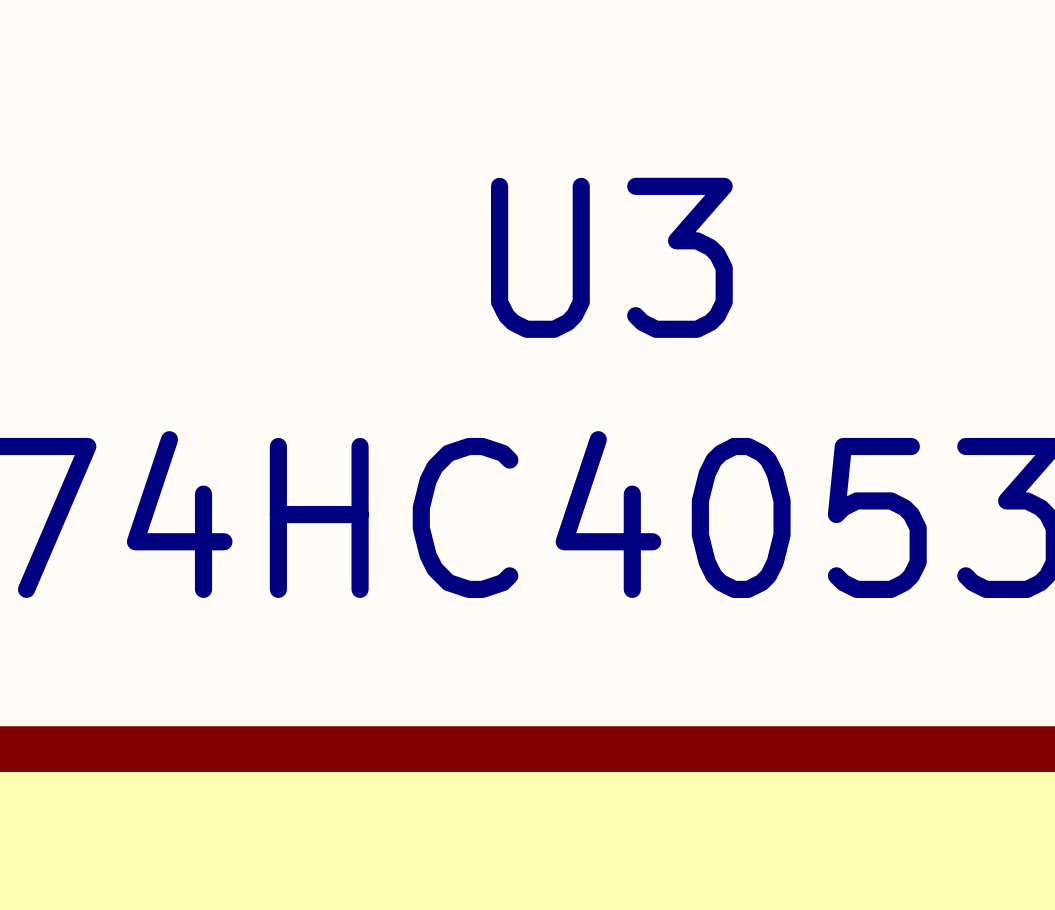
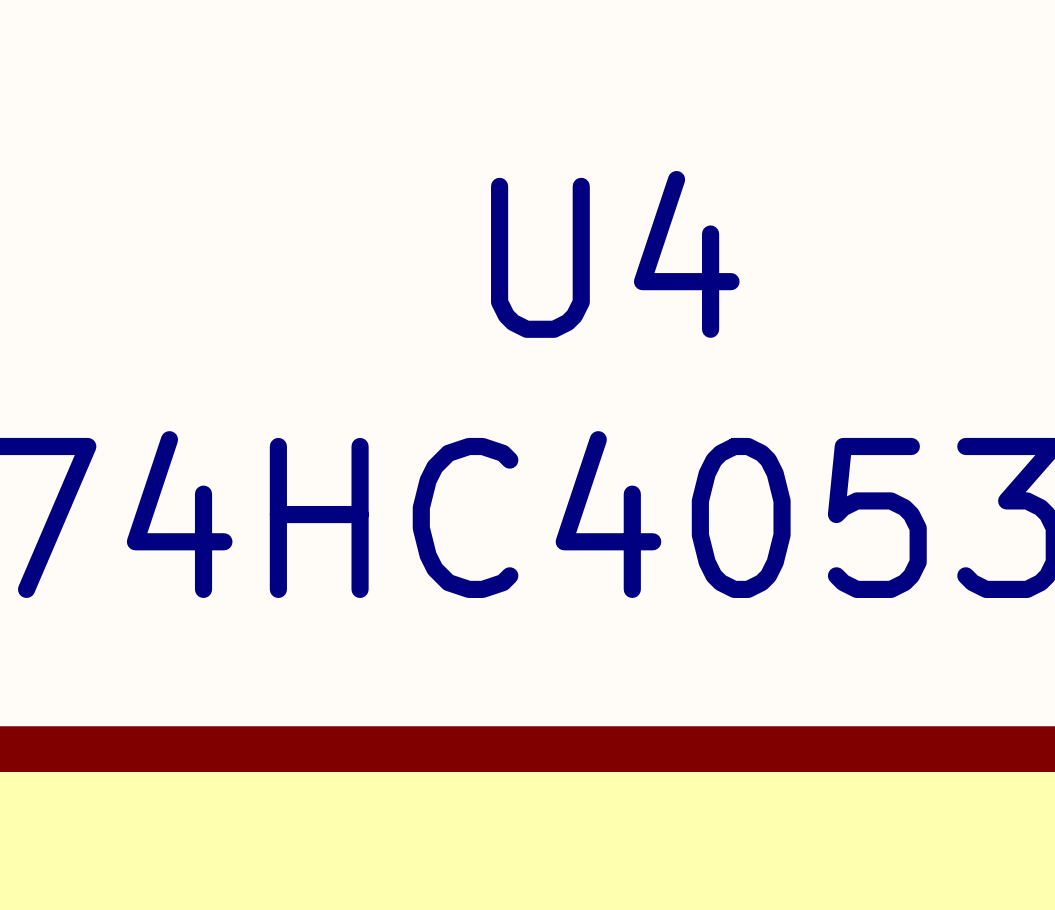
U3 name: U3 (611, 257) -> U4 (615, 254)

